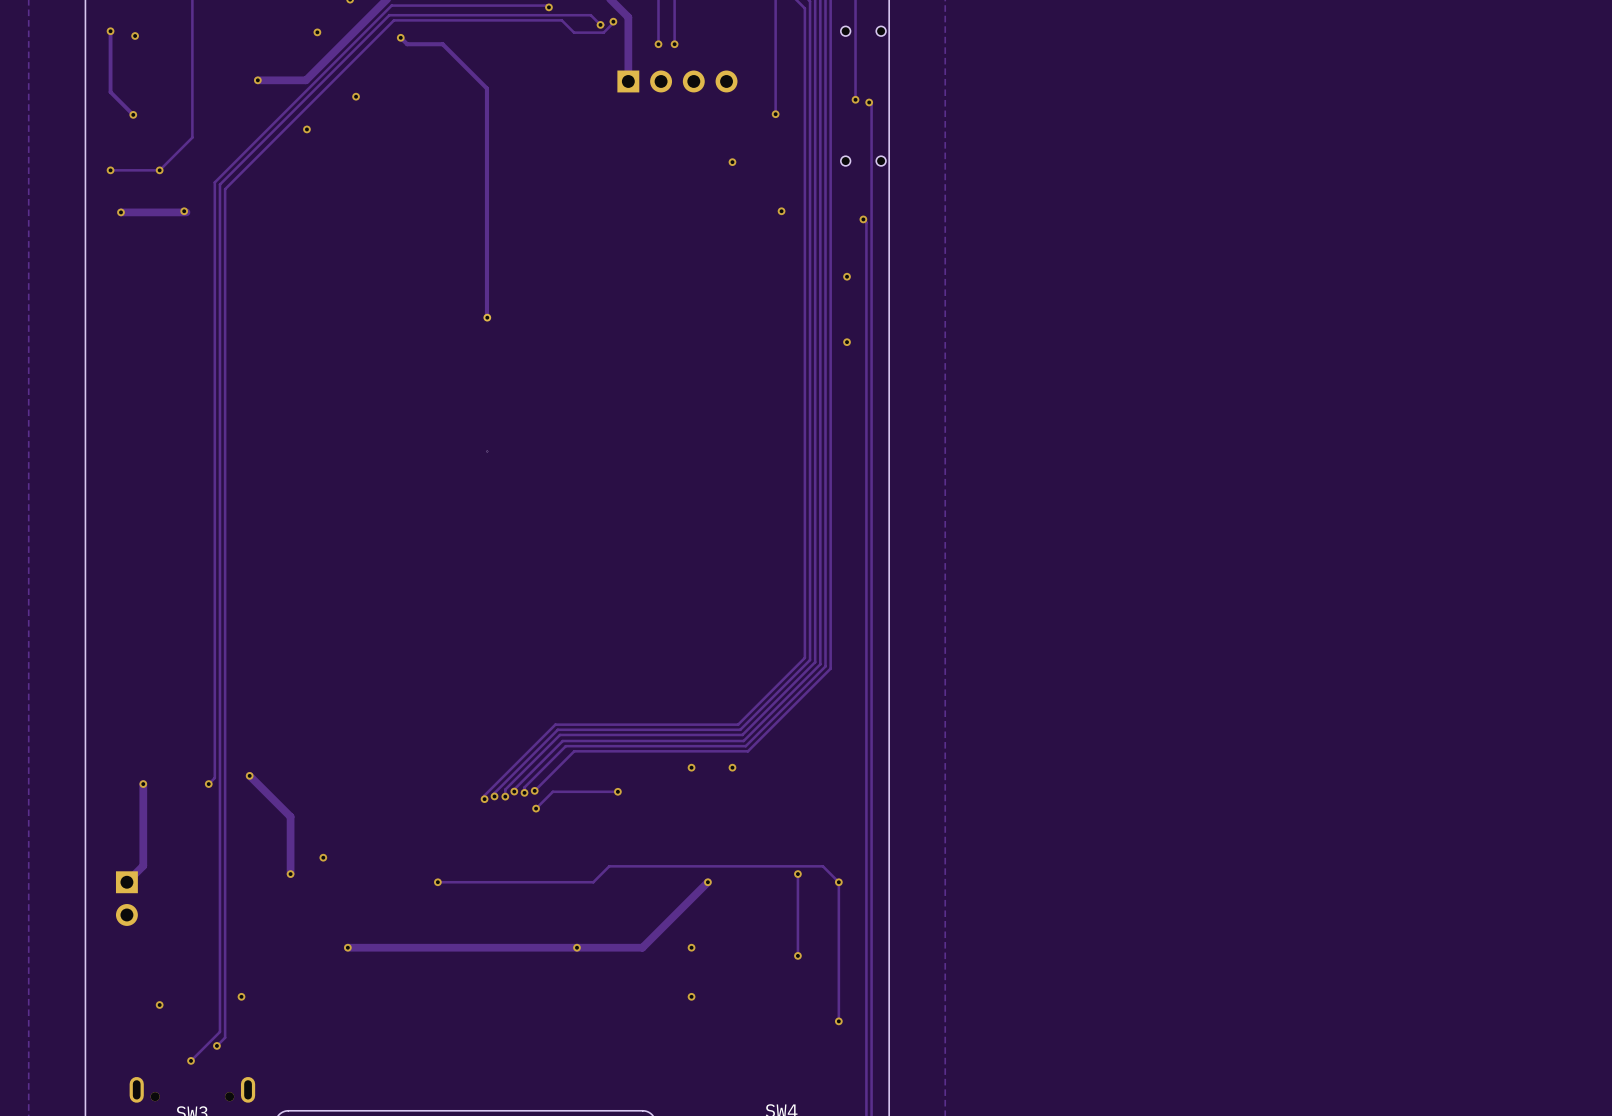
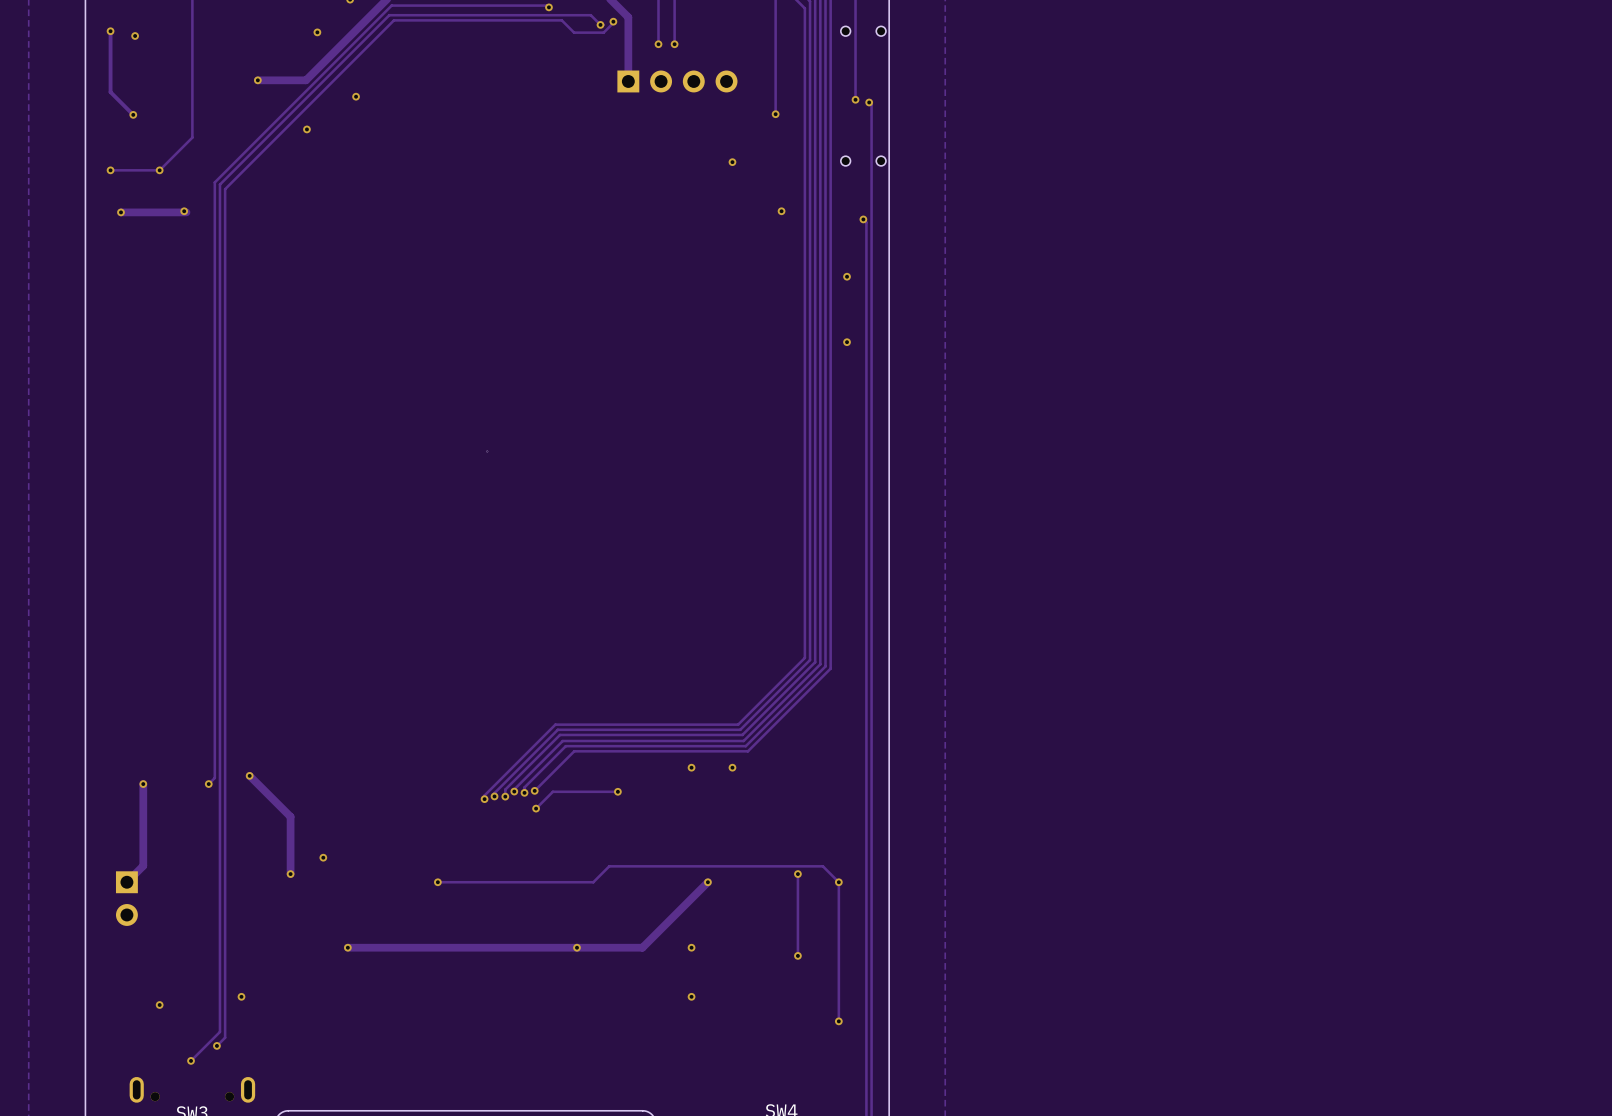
track: (400, 37) (407, 44) (442, 44) (486, 88) (487, 317) -> none
via: (400, 37) -> none
part: (487, 317) -> none

